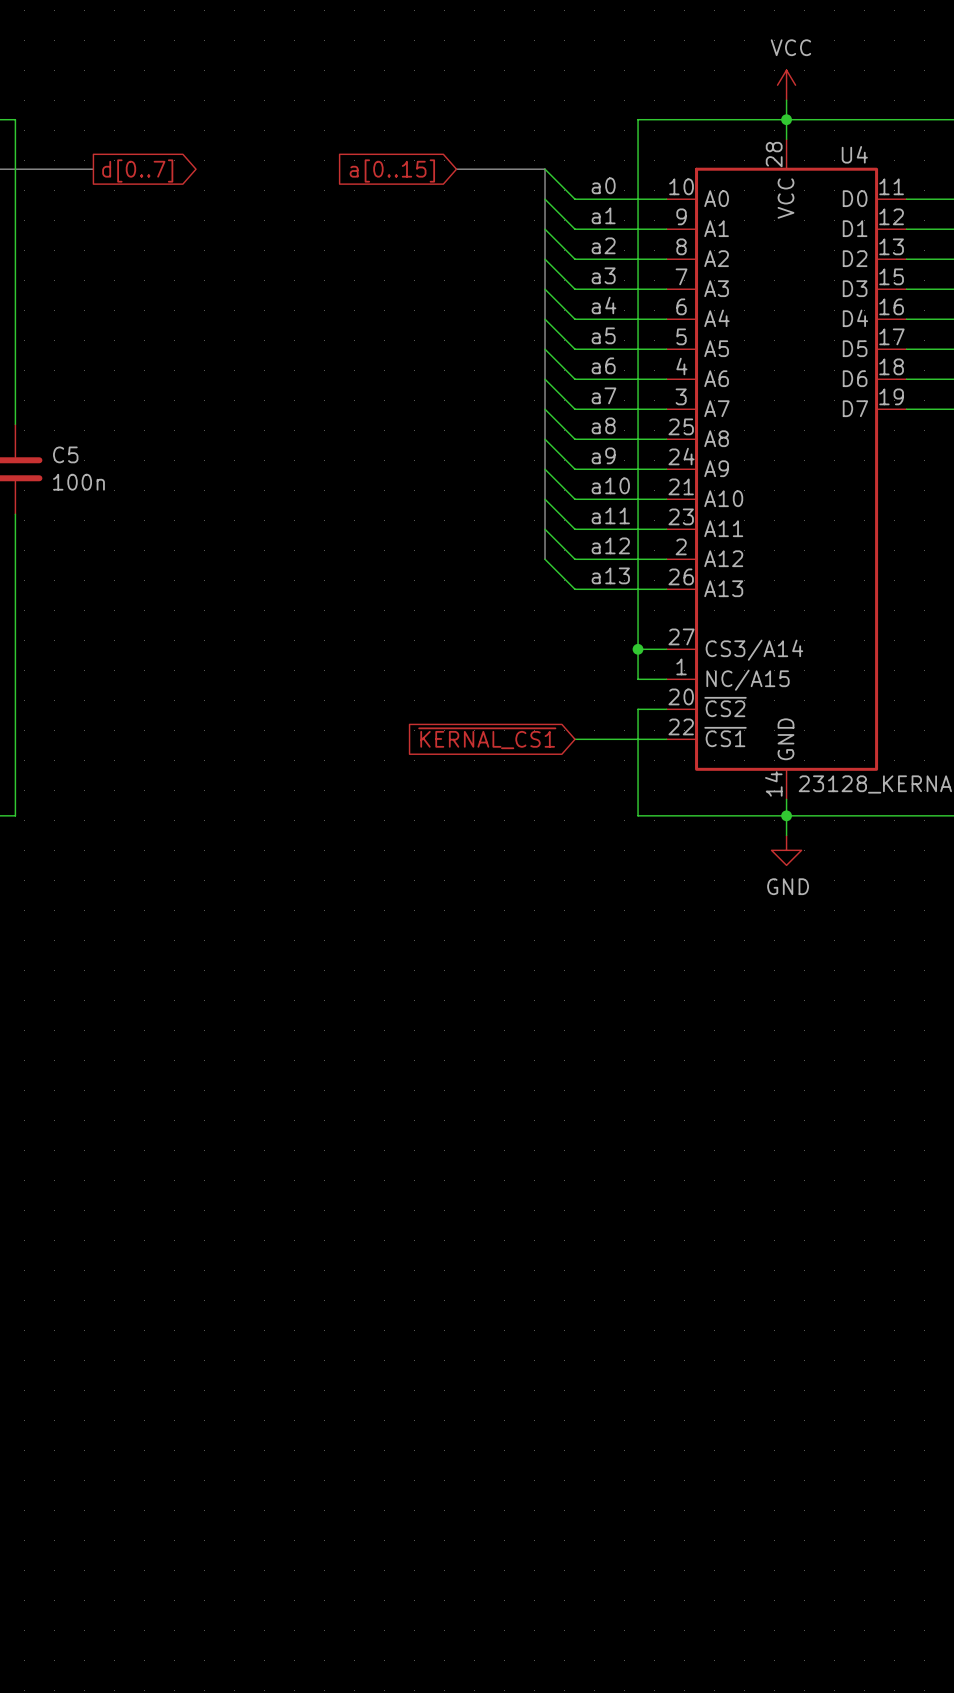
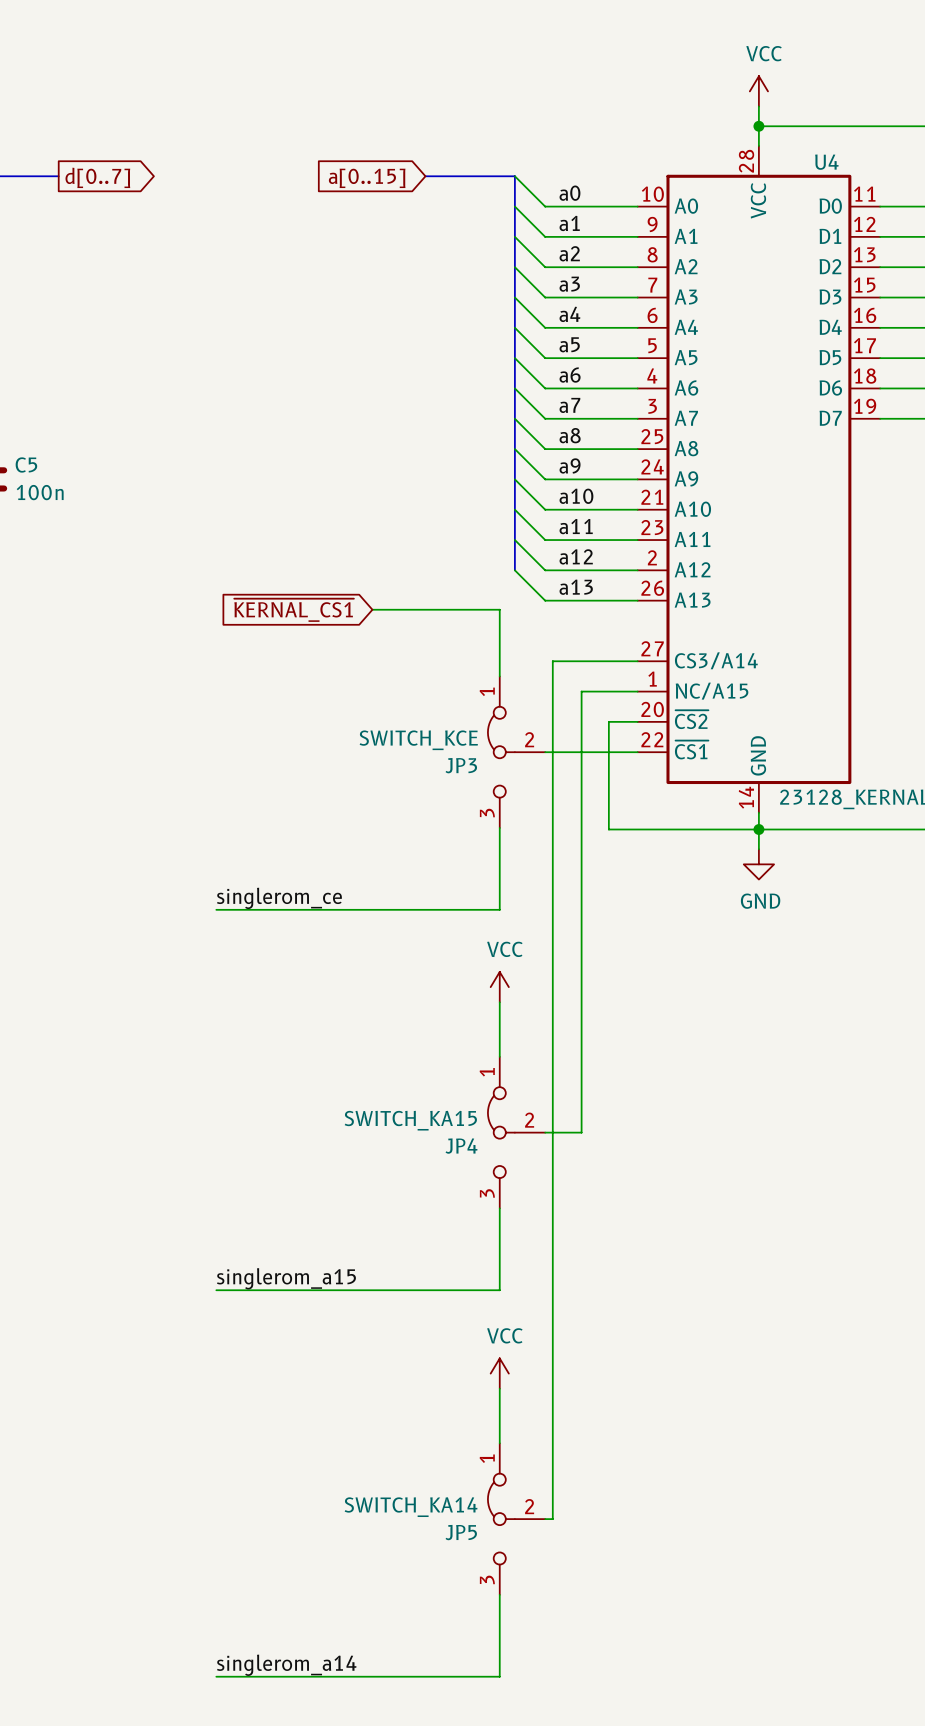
wire: (786, 119) (638, 119) (638, 679) -> (545, 1132) (581, 1132) (581, 691) (608, 691)
wire: none -> (372, 609) (499, 609) (499, 676)
wire: none -> (608, 661) (552, 661) (552, 1519) (545, 1519)
junction: (638, 649) -> none
global label position: ~{KERNAL_CS1} (487, 738) -> ~{KERNAL_CS1} (294, 610)
JP3: none -> SWITCH_KCE (516, 752)
wire: none -> (499, 827) (499, 909) (216, 909)
label: none -> singlerom_ce (279, 898)
power symbol: none -> VCC (499, 987)
wire: none -> (499, 1002) (499, 1056)
JP4: none -> SWITCH_KA15 (516, 1132)
wire: none -> (499, 1208) (499, 1290) (216, 1290)
label: none -> singlerom_a15 (286, 1278)
power symbol: none -> VCC (499, 1373)
wire: none -> (499, 1388) (499, 1443)
JP5: none -> SWITCH_KA14 (516, 1519)
wire: none -> (499, 1594) (499, 1676) (216, 1676)
label: none -> singlerom_a14 (286, 1665)

